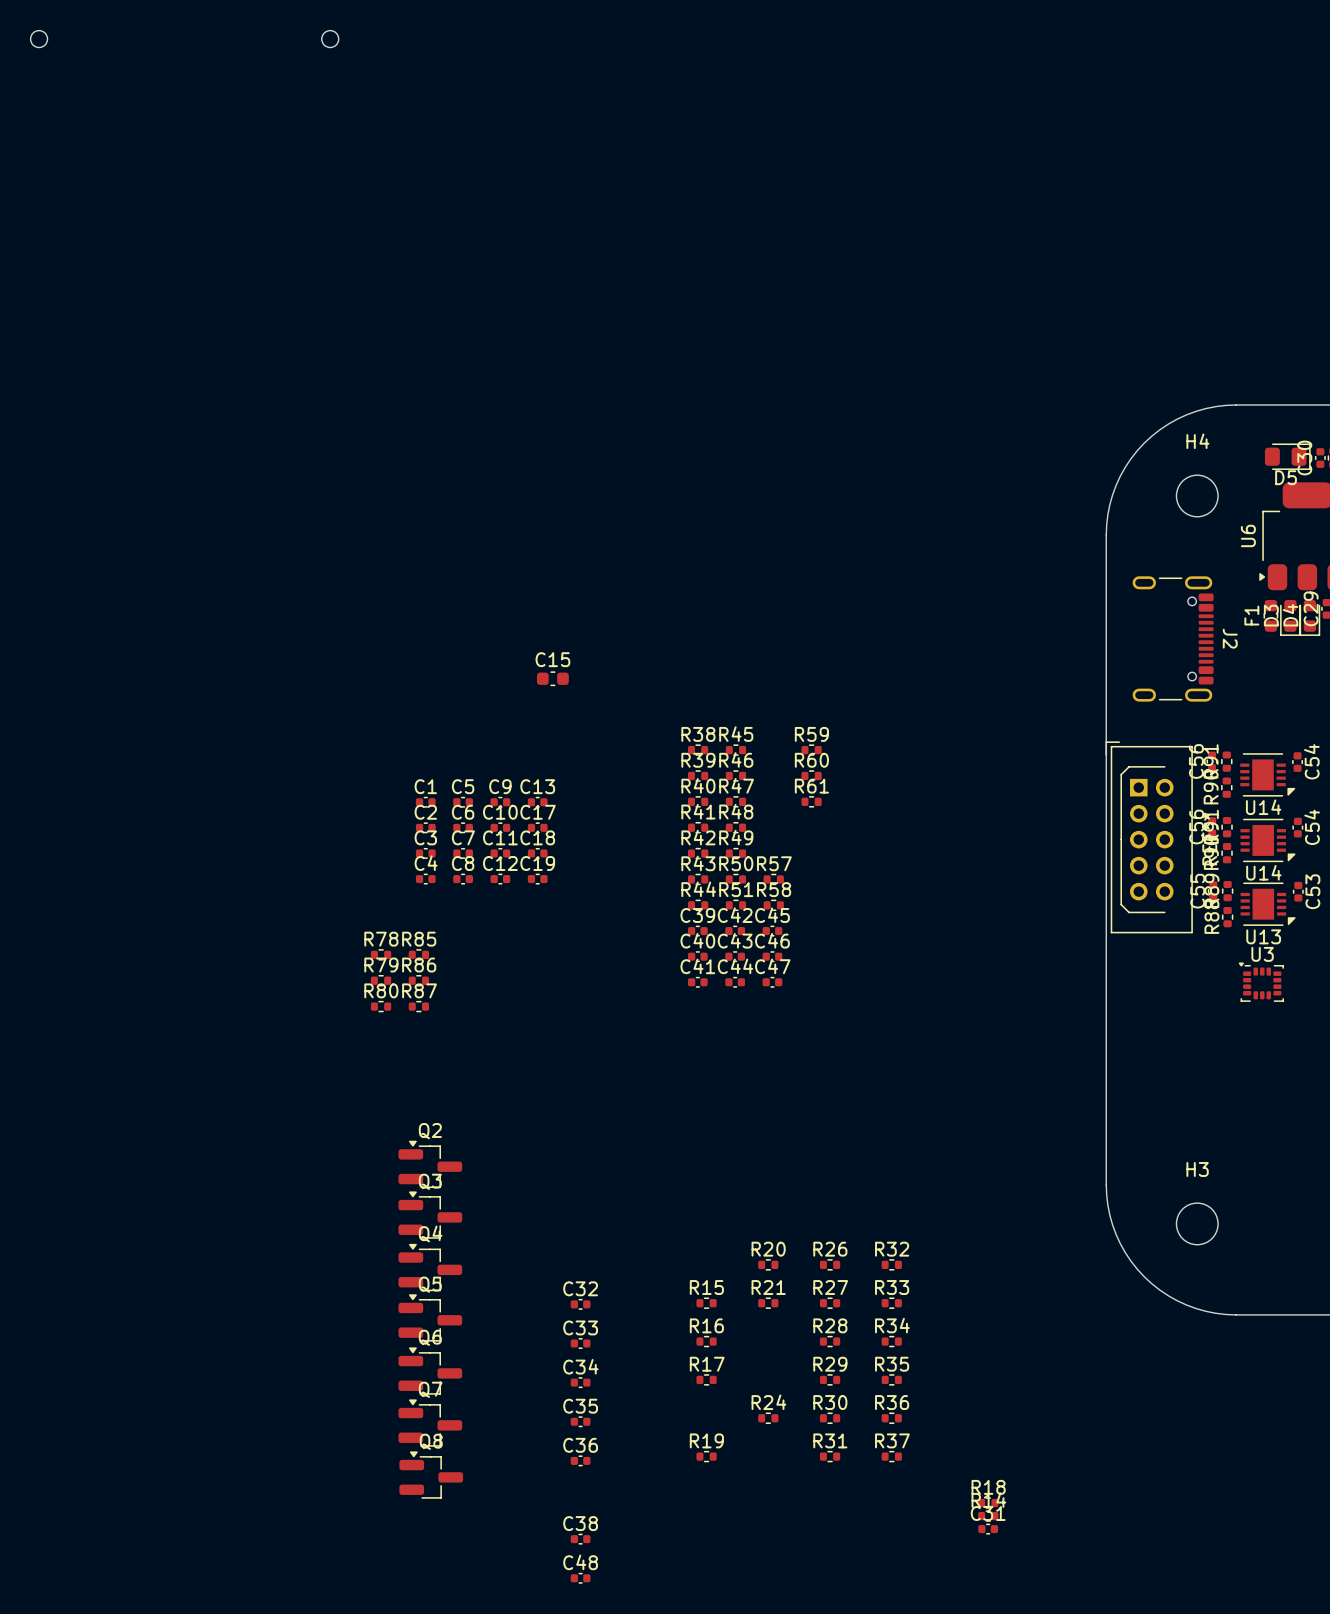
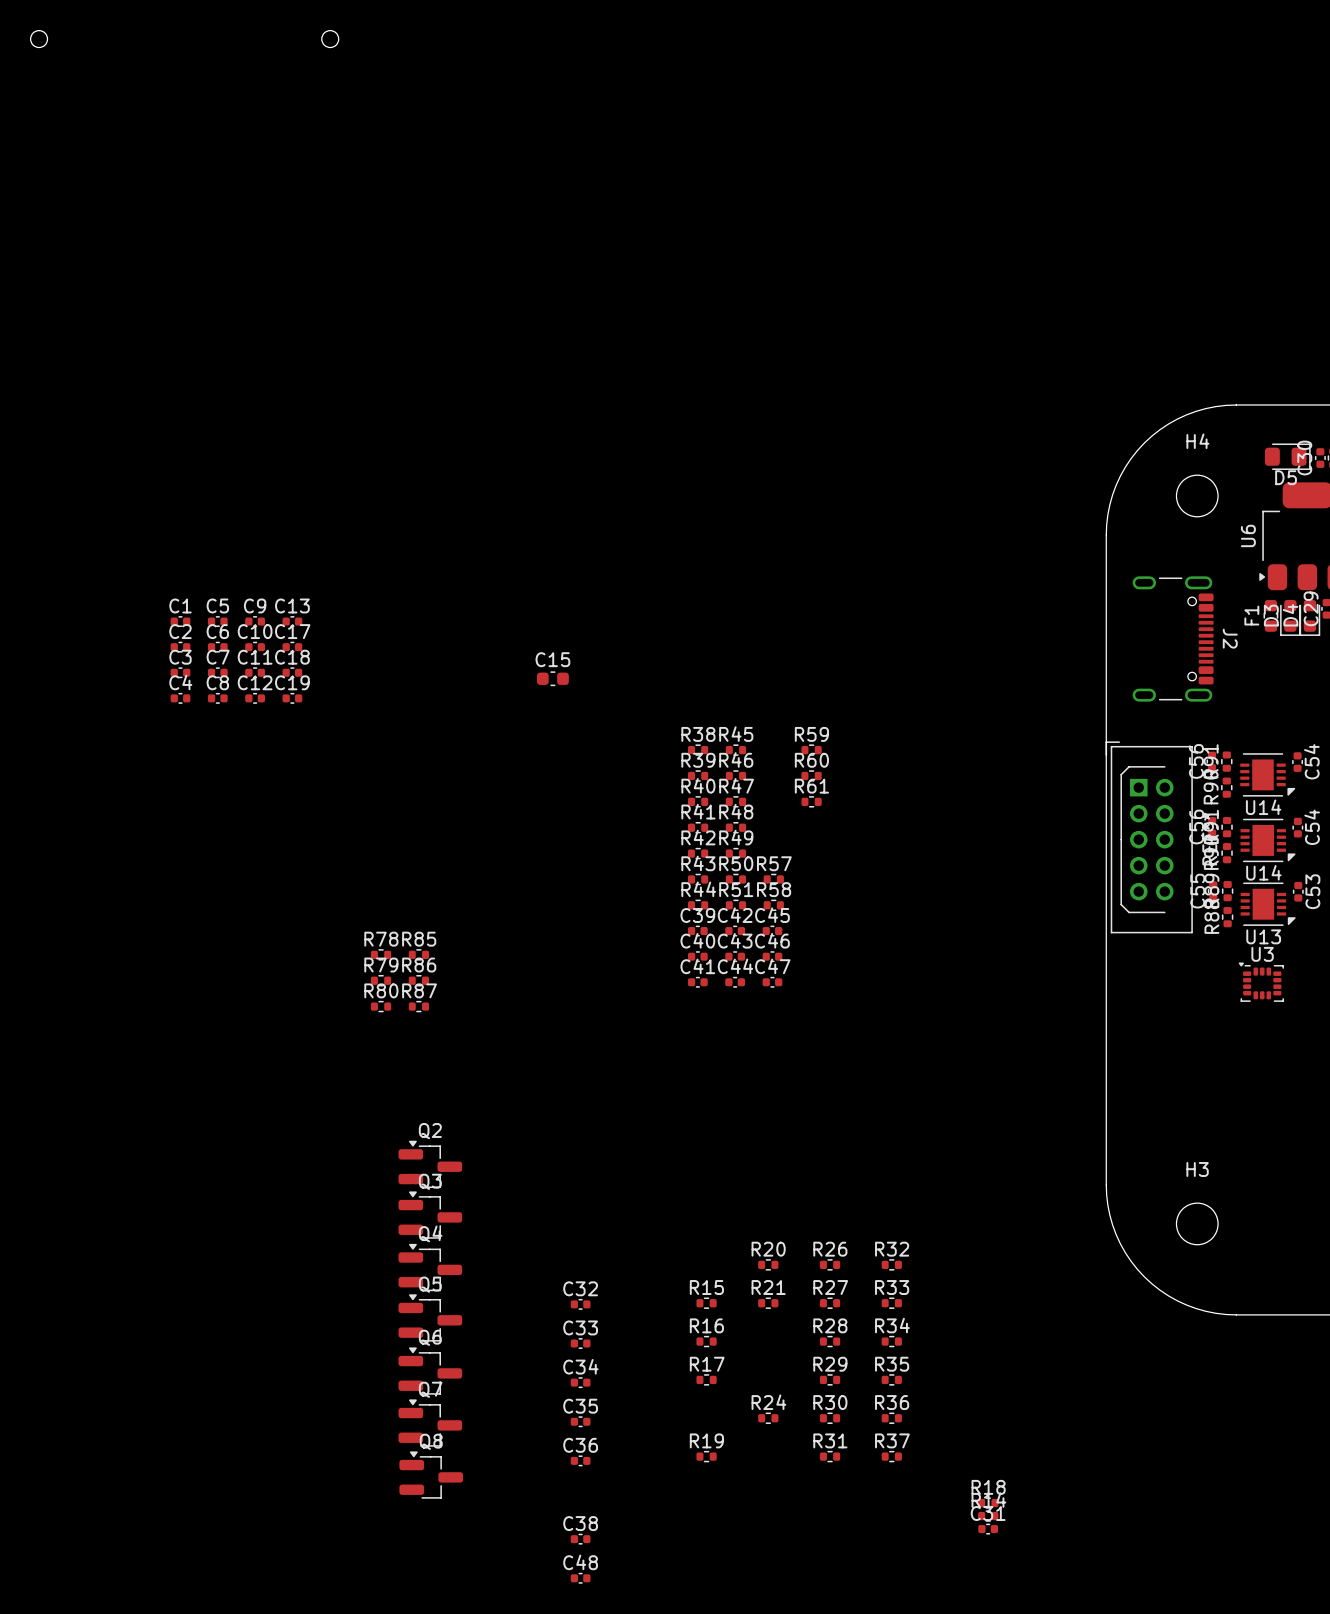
C1 position: (425, 802) -> (180, 621)
C5 position: (463, 802) -> (217, 621)
C9 position: (500, 802) -> (255, 621)
C13 position: (537, 802) -> (292, 621)
C2 position: (425, 827) -> (180, 647)
C6 position: (463, 827) -> (217, 647)
C10 position: (500, 827) -> (255, 647)
C17 position: (537, 827) -> (292, 647)
C3 position: (425, 853) -> (180, 672)
C7 position: (463, 853) -> (217, 672)
C11 position: (500, 853) -> (255, 672)
C18 position: (537, 853) -> (292, 672)
C4 position: (425, 879) -> (180, 698)
C8 position: (463, 879) -> (217, 698)
C12 position: (500, 879) -> (255, 698)
C19 position: (537, 879) -> (292, 698)

